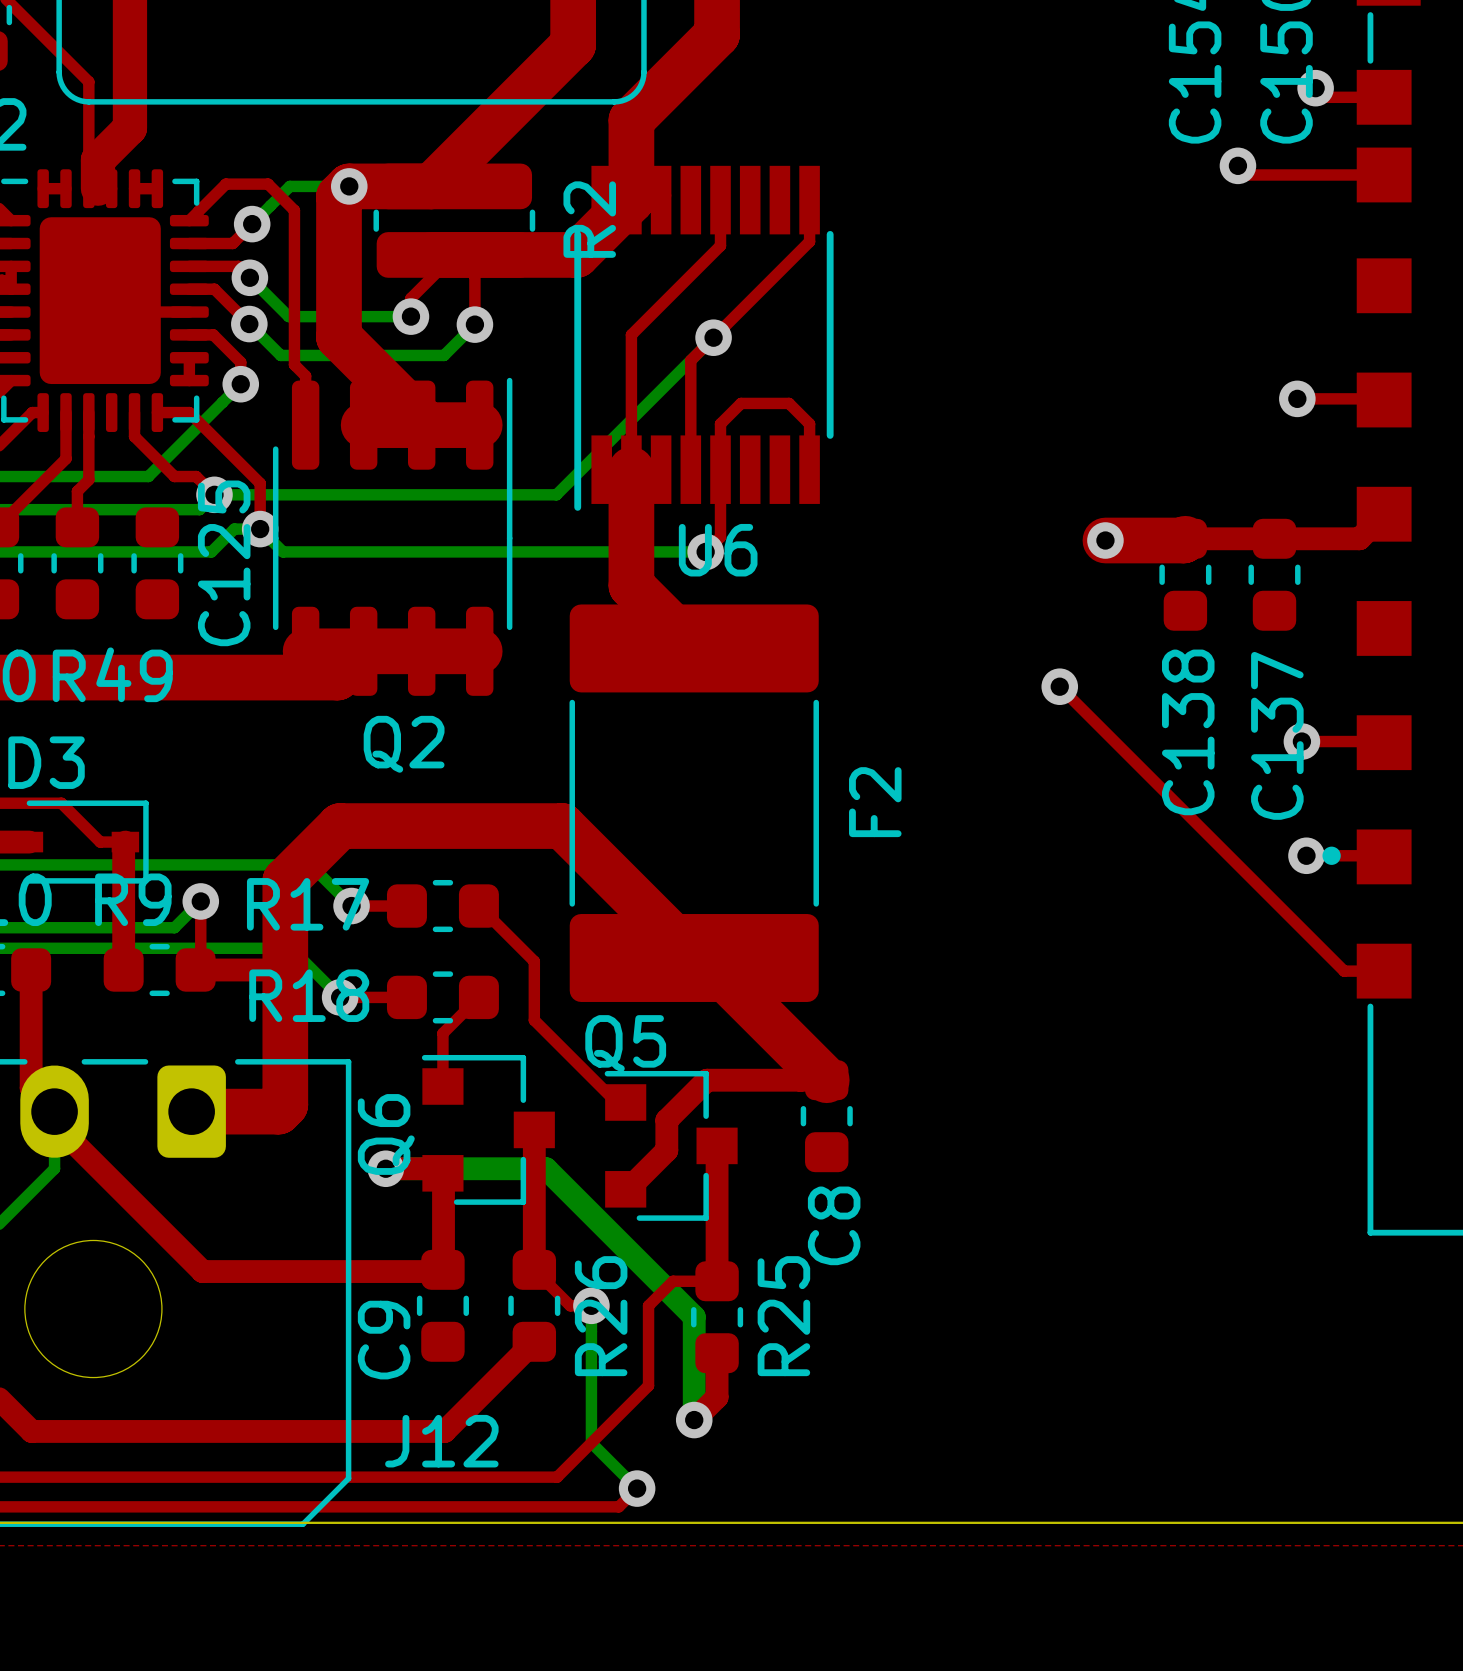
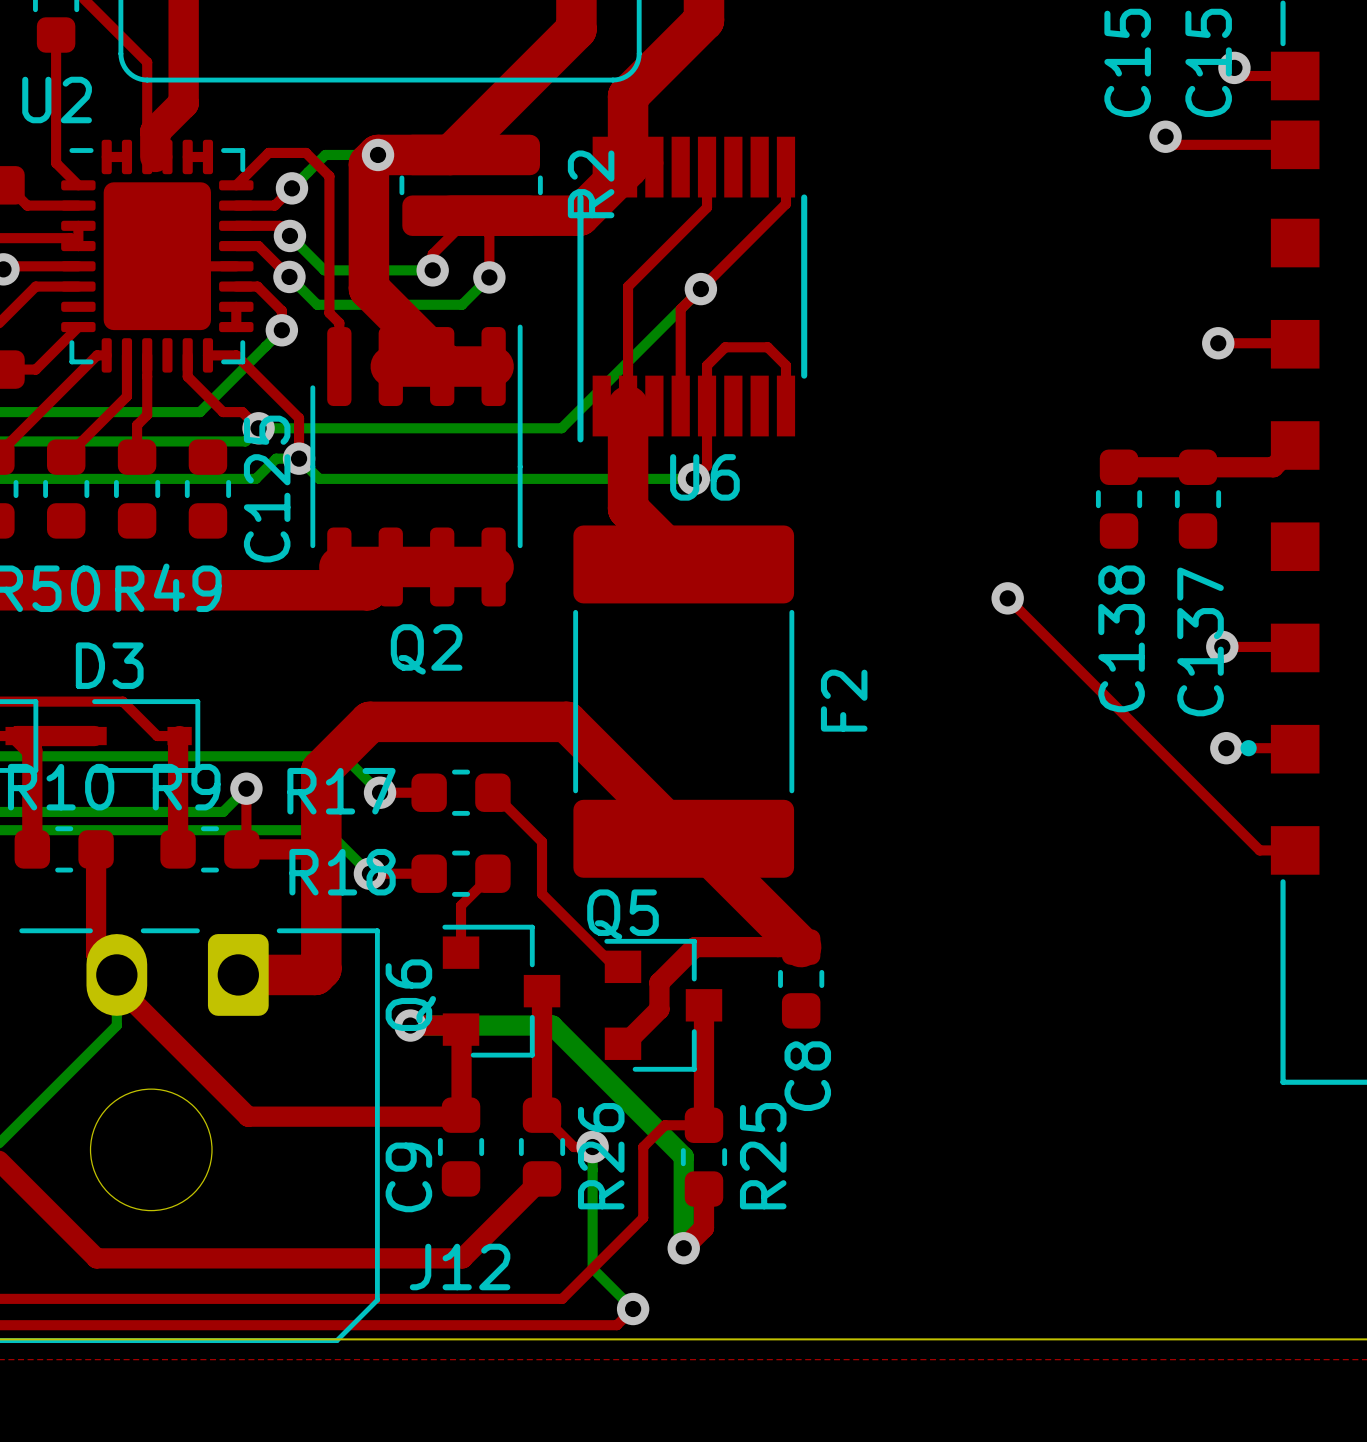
top track: (1185, 538) (1183, 540) (1105, 540) -> none
via: (1105, 540) -> none

